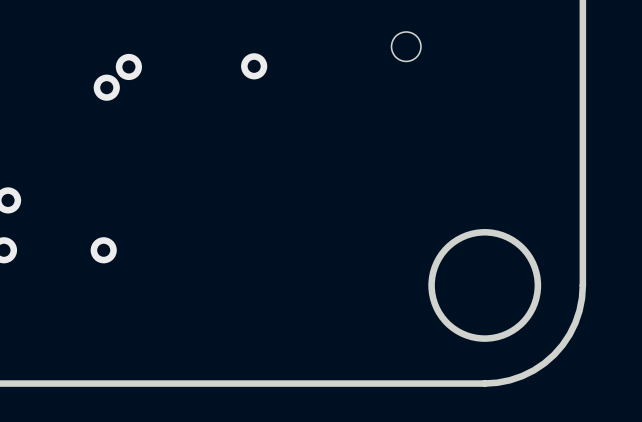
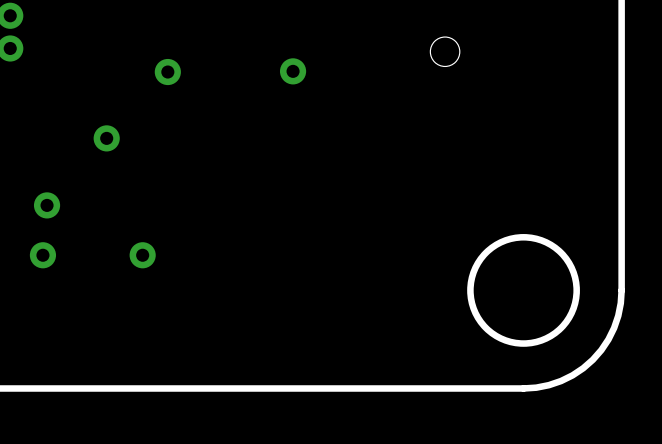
via position: (106, 87) -> (106, 138)

